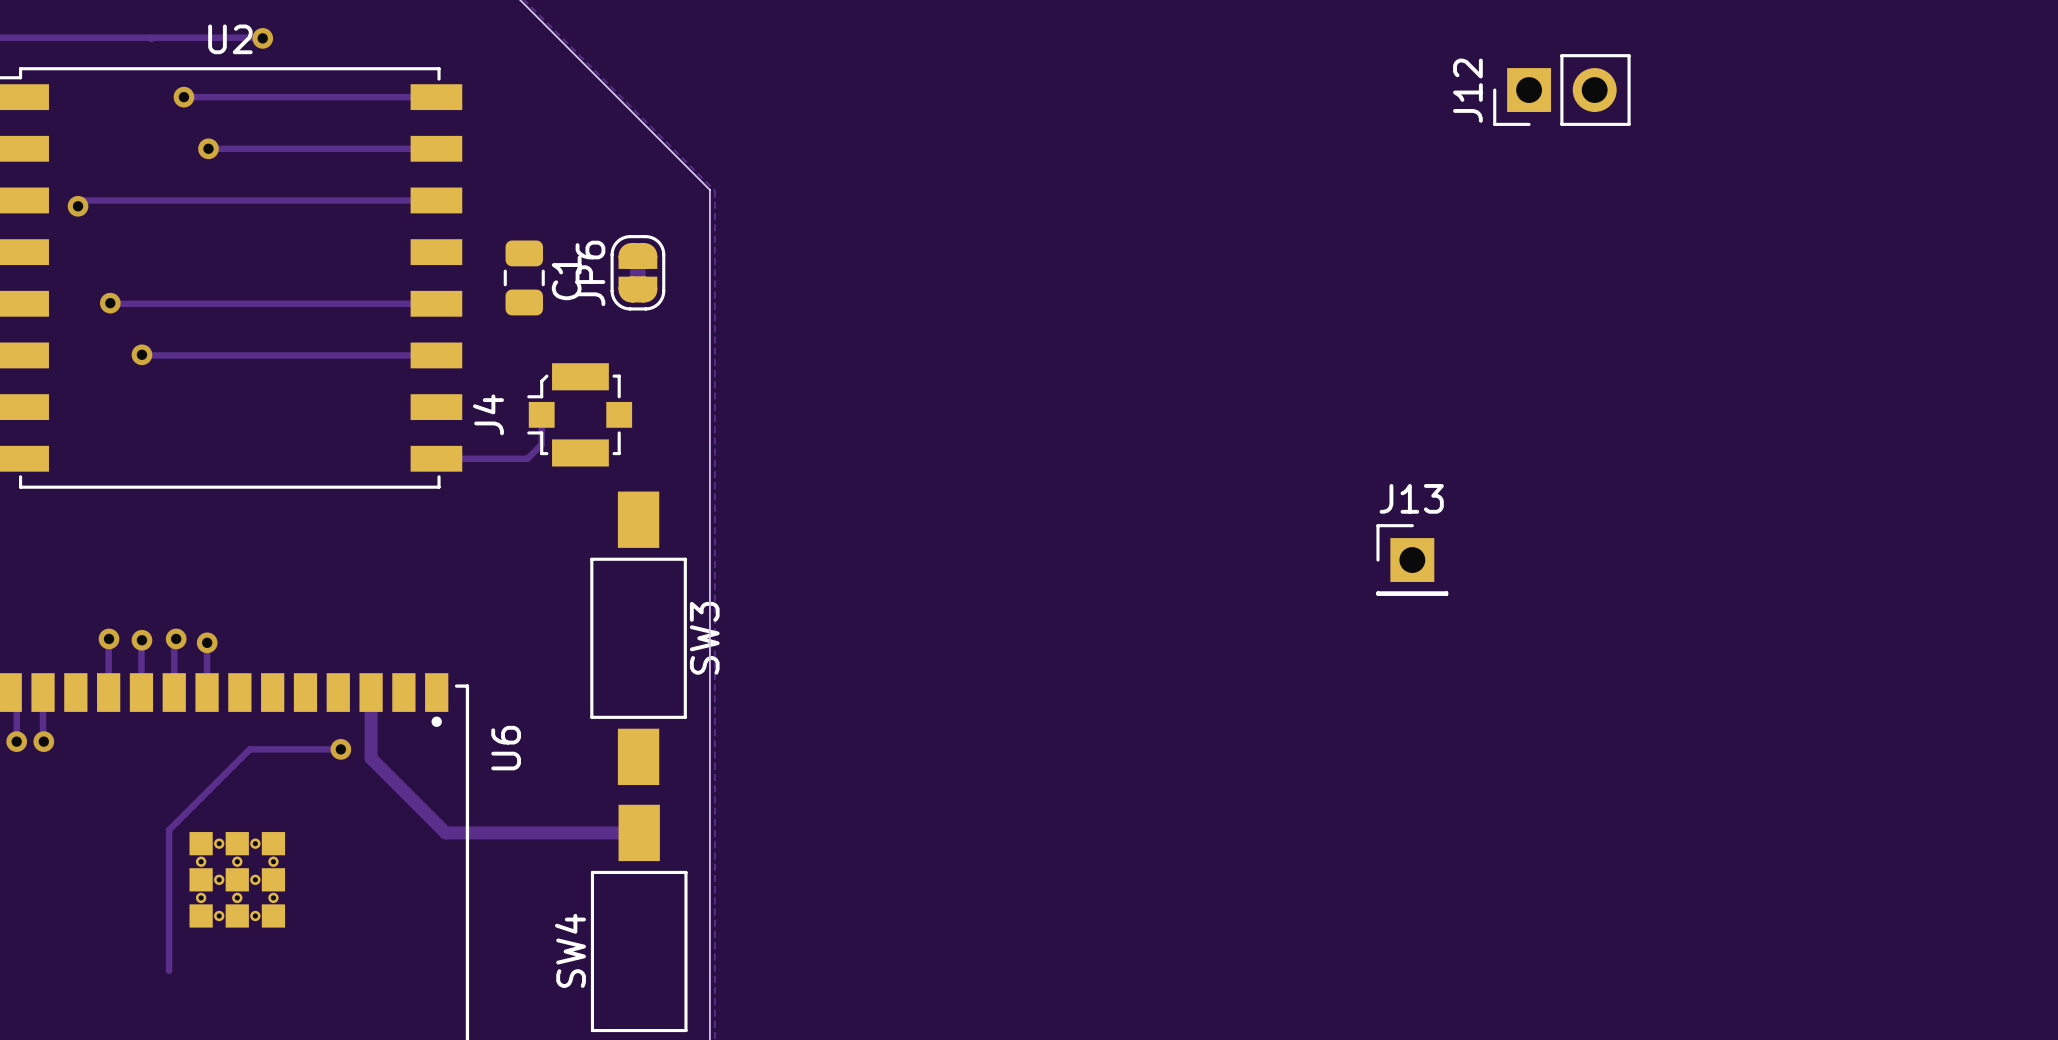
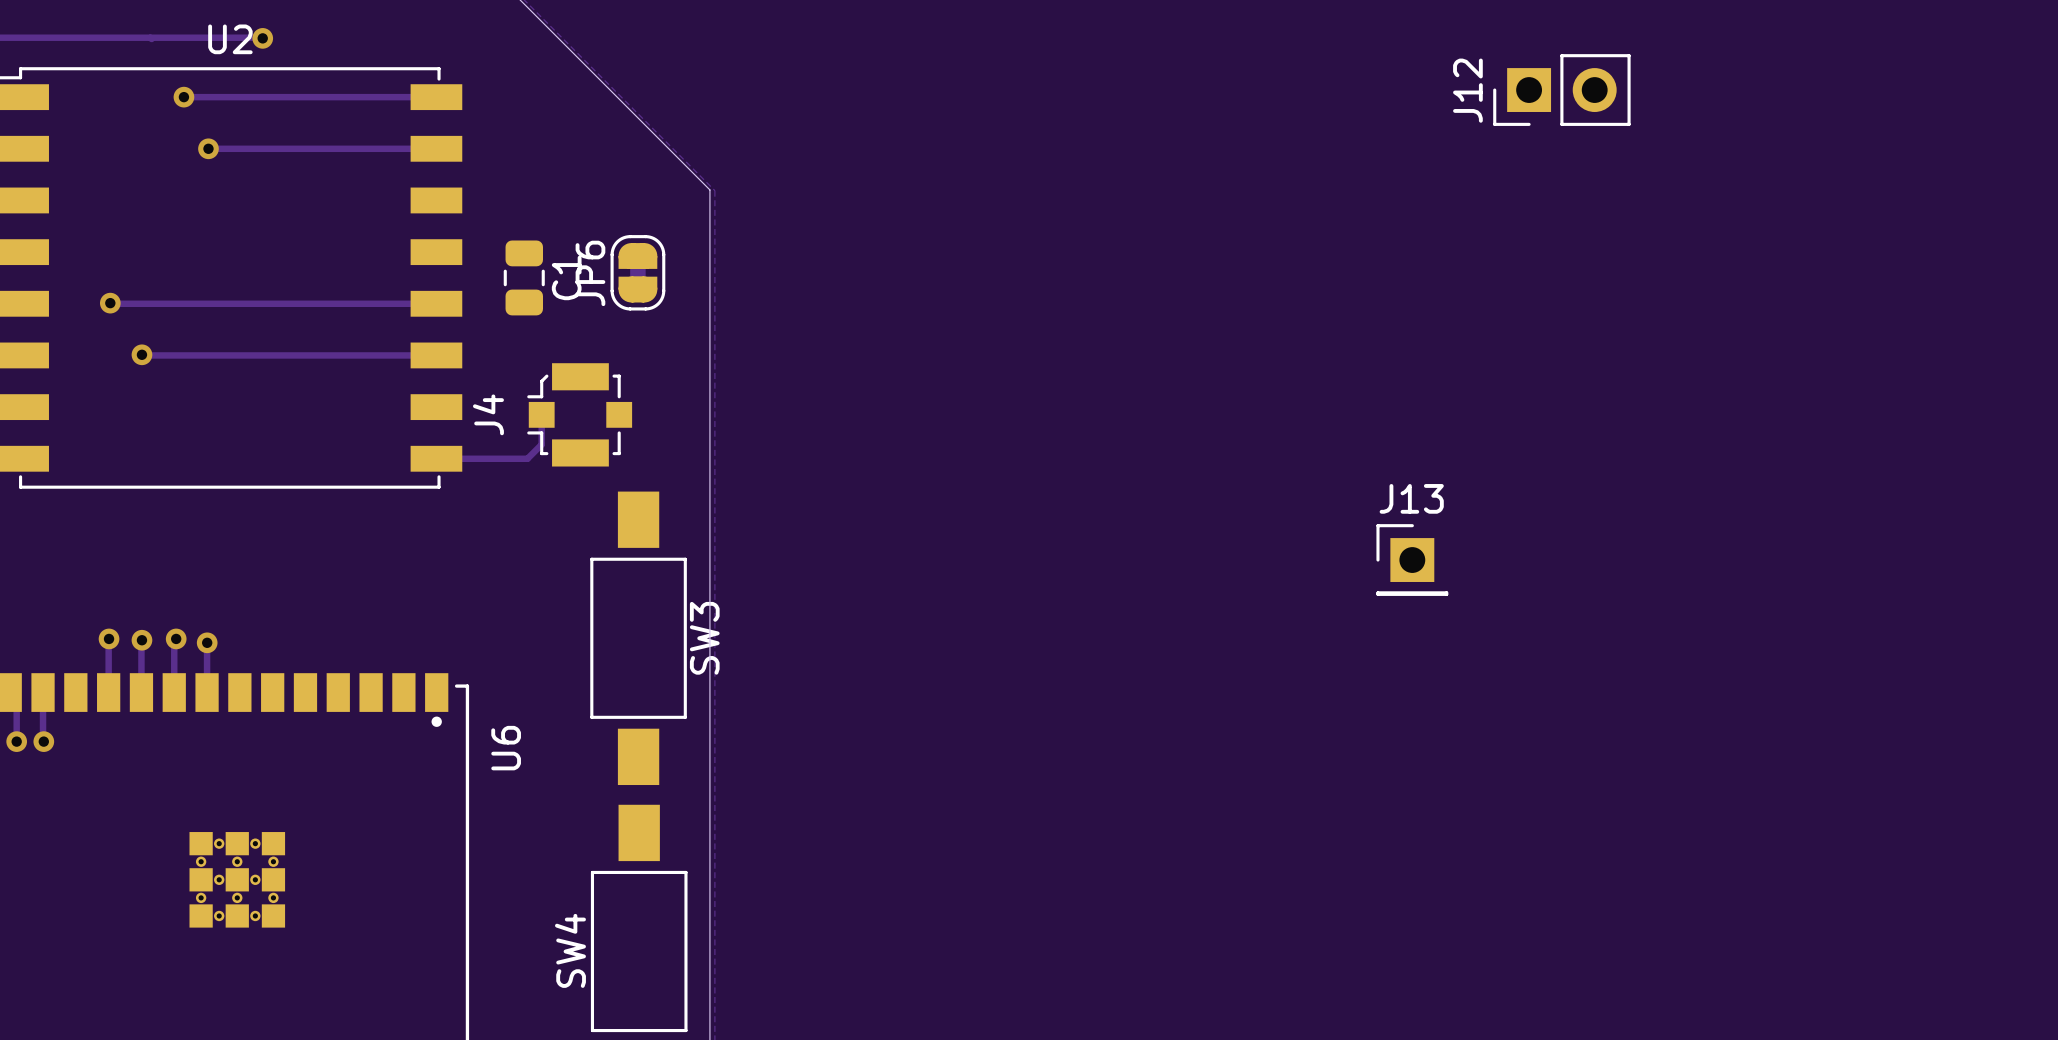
track: (436, 200) (83, 200) (78, 206) -> none
via: (78, 206) -> none
track: (371, 692) (371, 758) (445, 832) (639, 832) -> none
track: (340, 749) (249, 749) (169, 830) (169, 970) -> none
via: (340, 749) -> none

